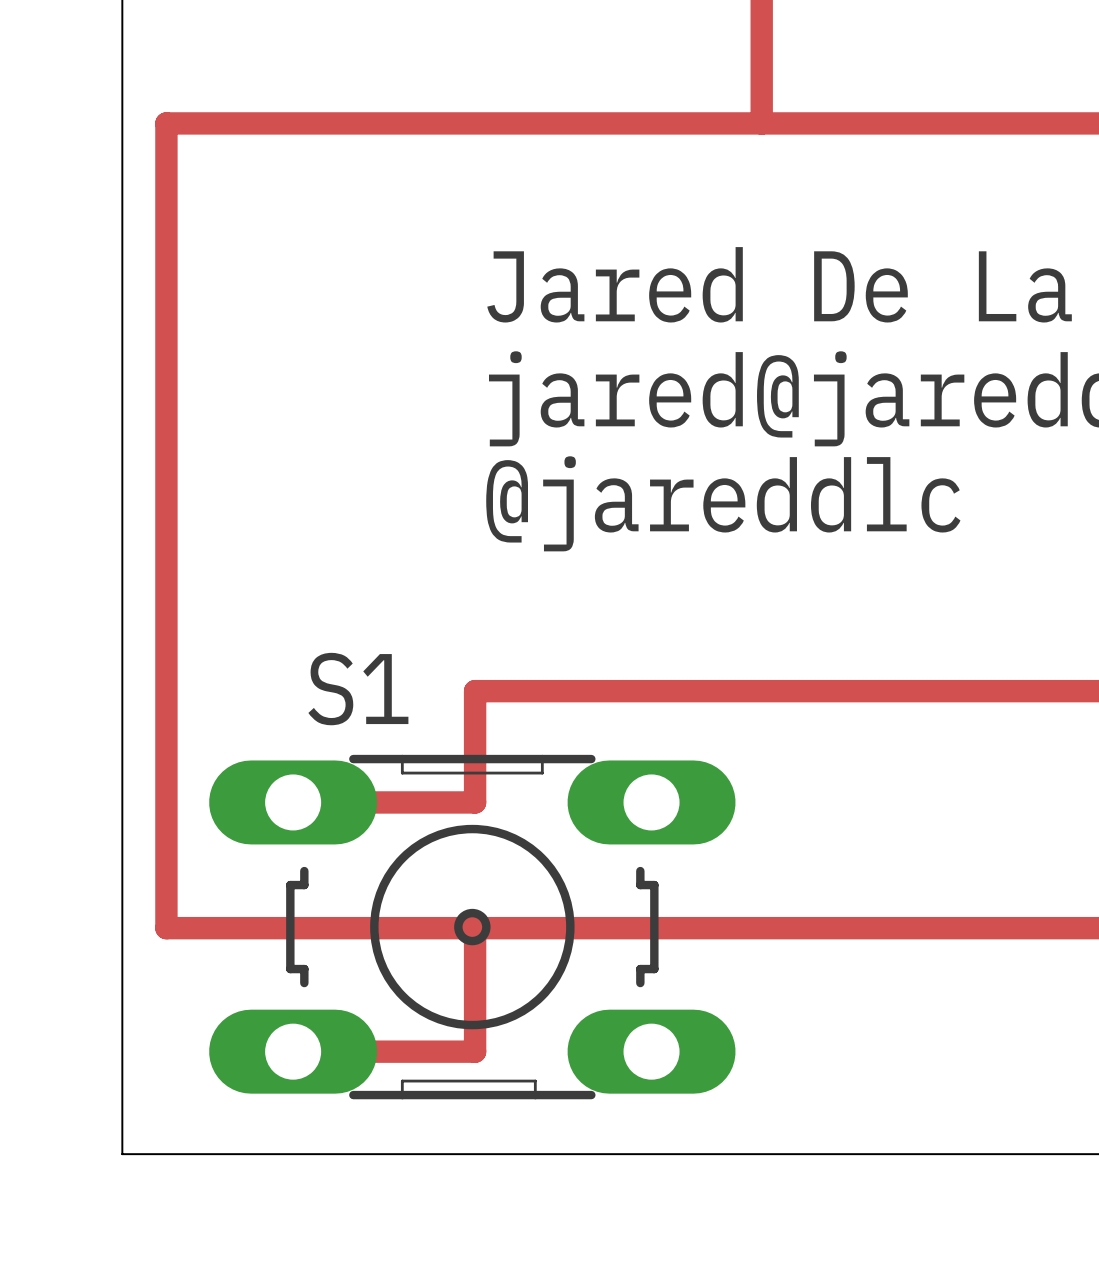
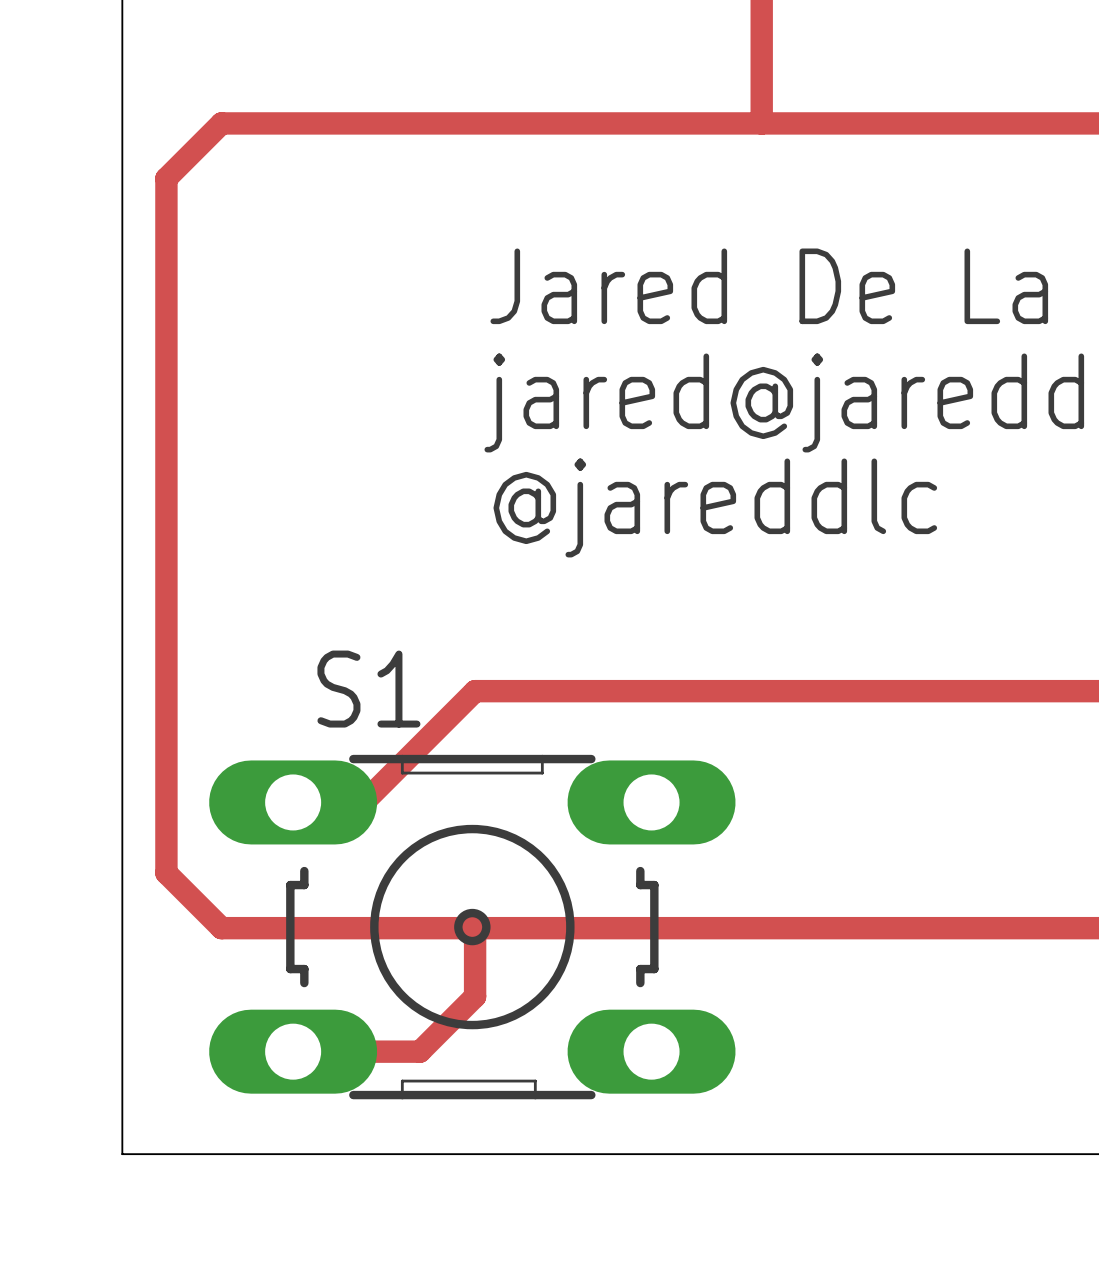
top track: (221, 123) (166, 123) (166, 178) -> (221, 123) (166, 178)
top track: (475, 691) (475, 802) (363, 802) -> (475, 691) (363, 802)
top track: (166, 873) (166, 928) (221, 928) -> (166, 873) (221, 928)
top track: (475, 996) (475, 1051) (419, 1051) -> (475, 996) (419, 1051)

